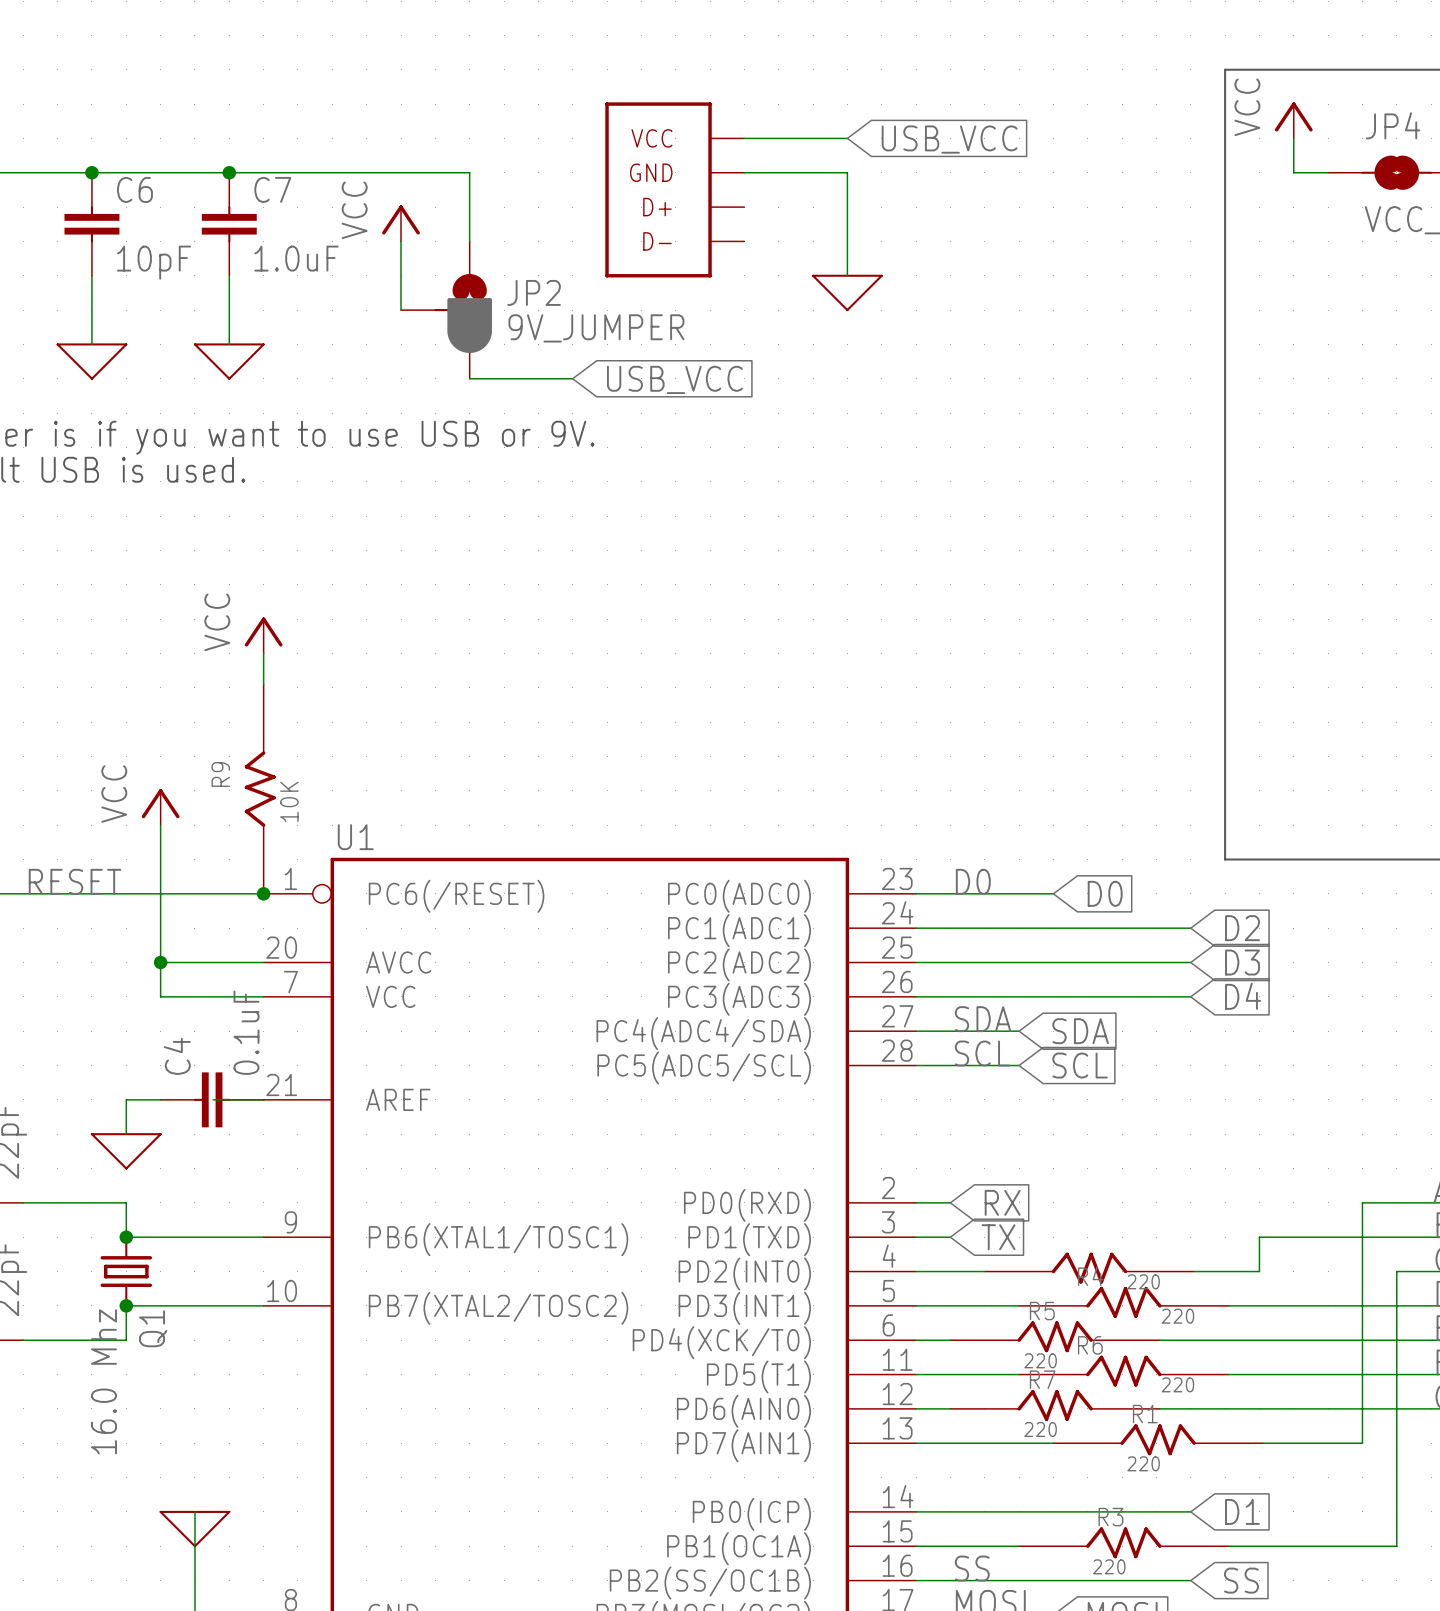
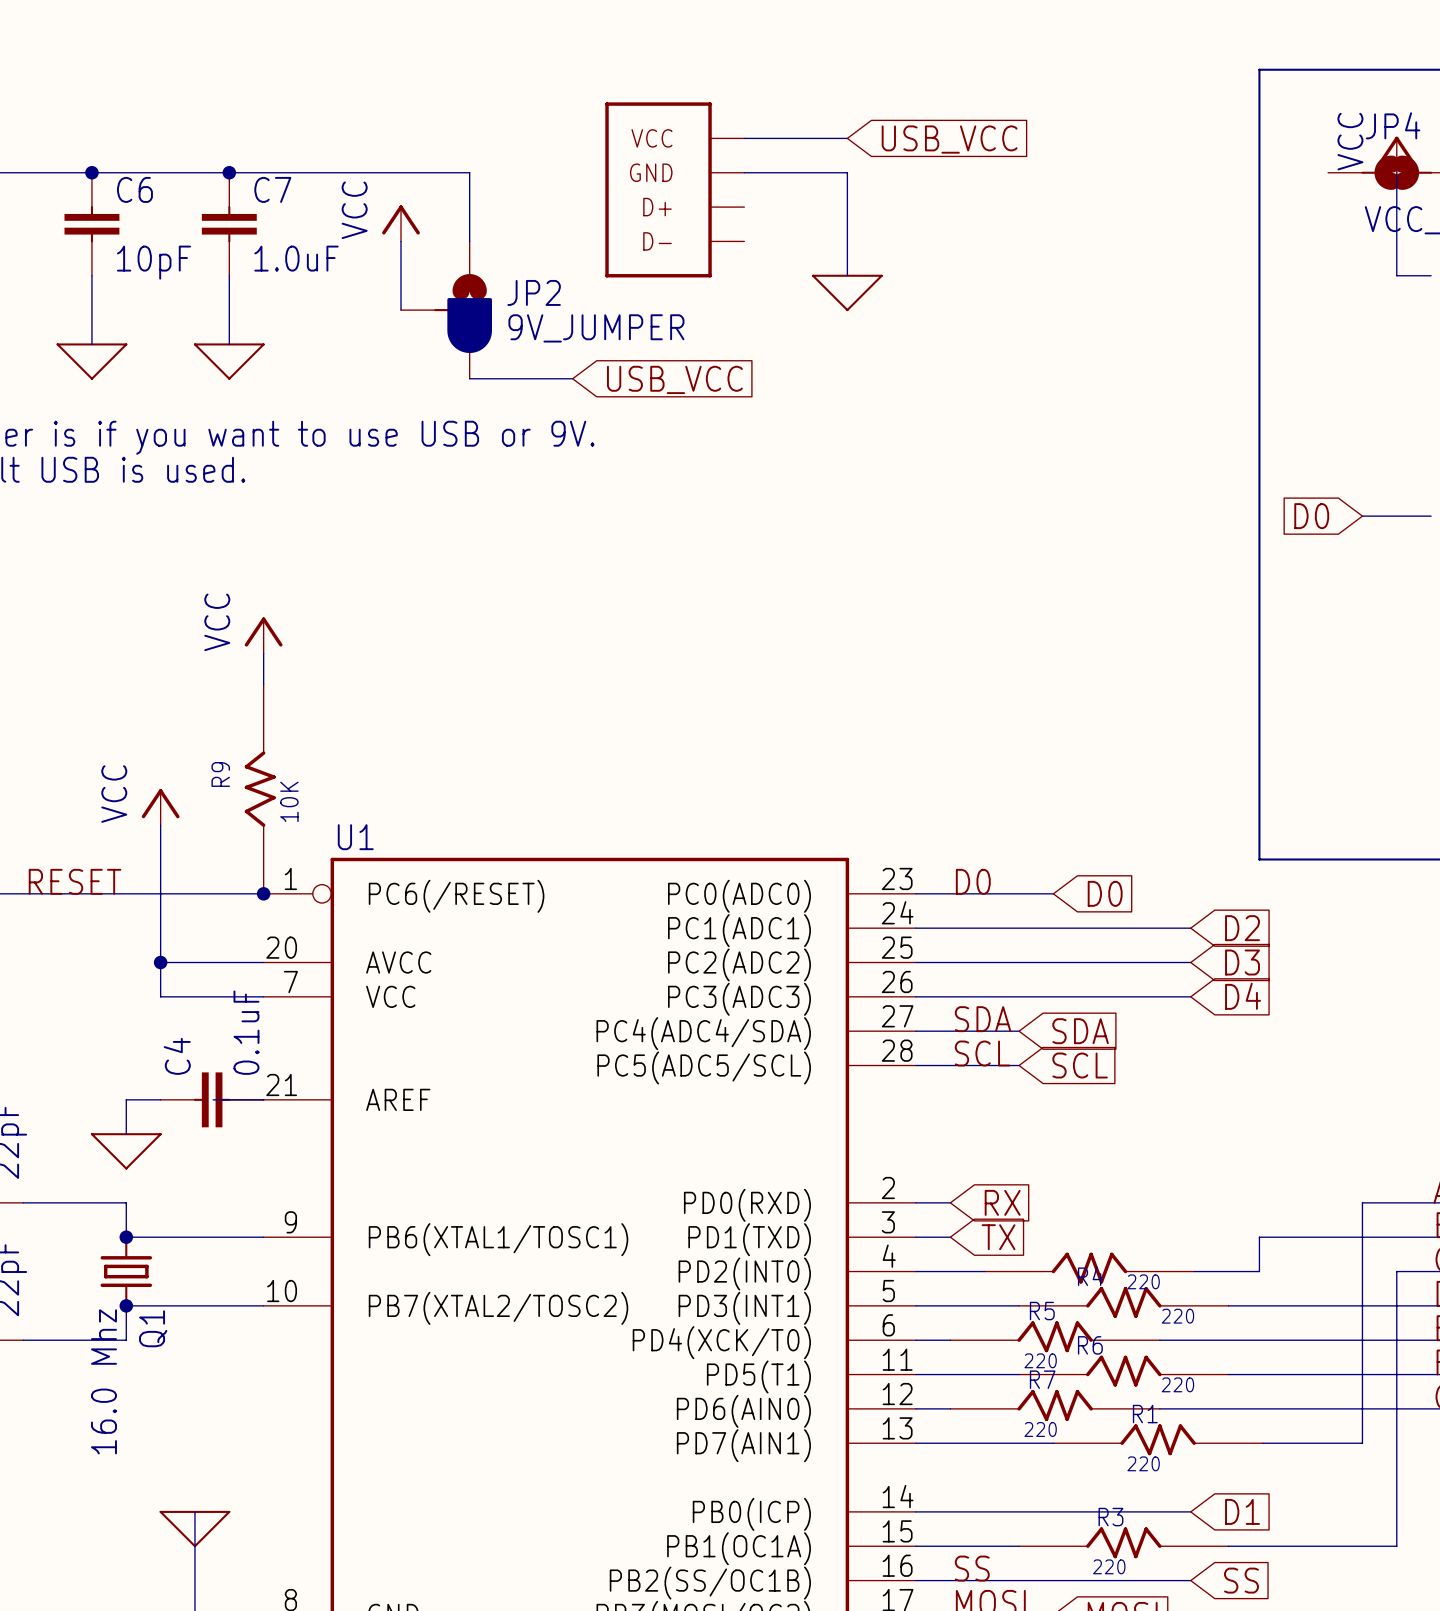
line: (1259, 69) (1225, 69) (1225, 859) (1259, 859) -> (1259, 69) (1259, 859)
power symbol position: VCC (1293, 120) -> VCC (1396, 154)
wire: (1293, 138) (1293, 172) (1328, 172) -> none
wire: none -> (1396, 172) (1396, 275) (1431, 275)
global label: none -> D0 (1311, 516)
wire: none -> (1362, 516) (1431, 516)

